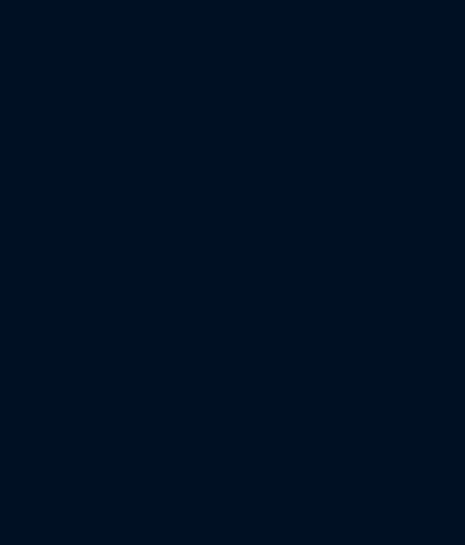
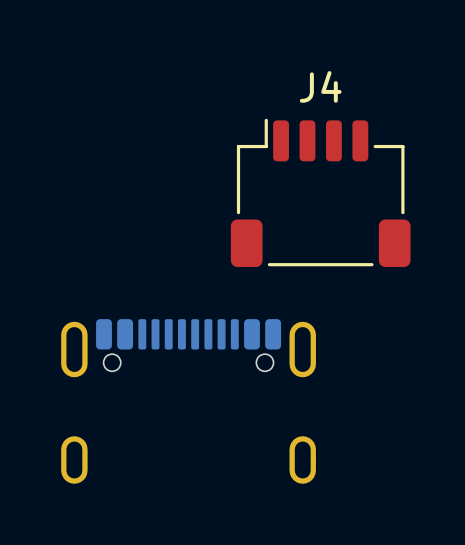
J4: none -> (320, 192)
part: none -> (188, 401)

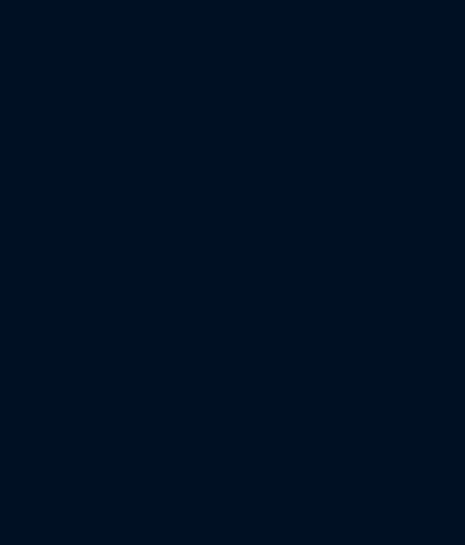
J4: (320, 192) -> none
part: (188, 401) -> none

